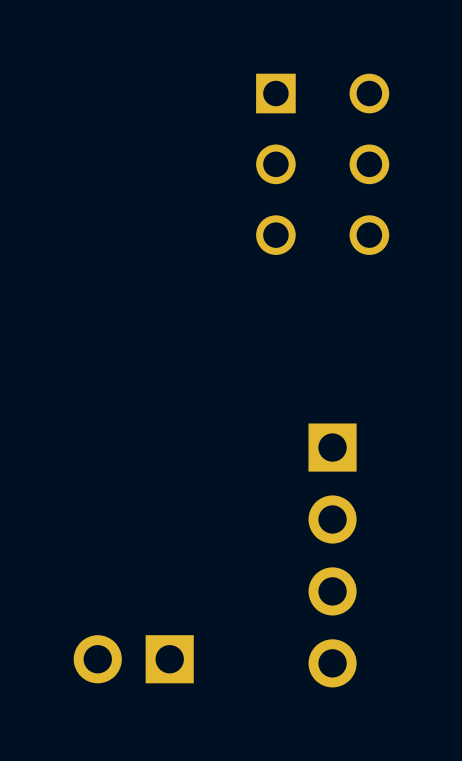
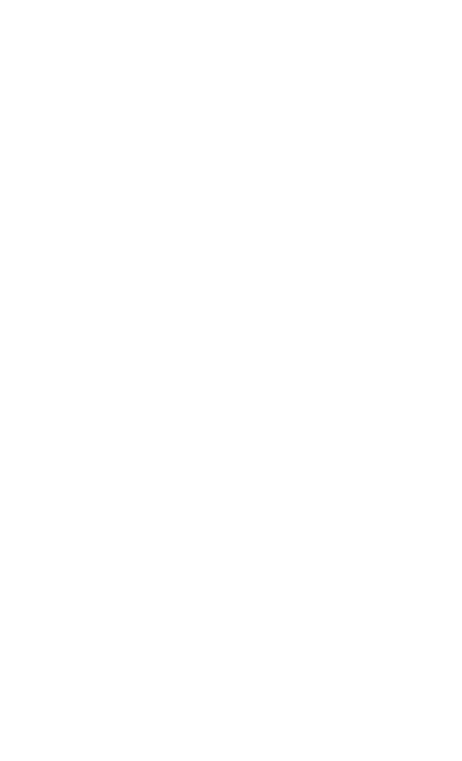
part: (322, 164) -> none
part: (332, 555) -> none
part: (133, 659) -> none

